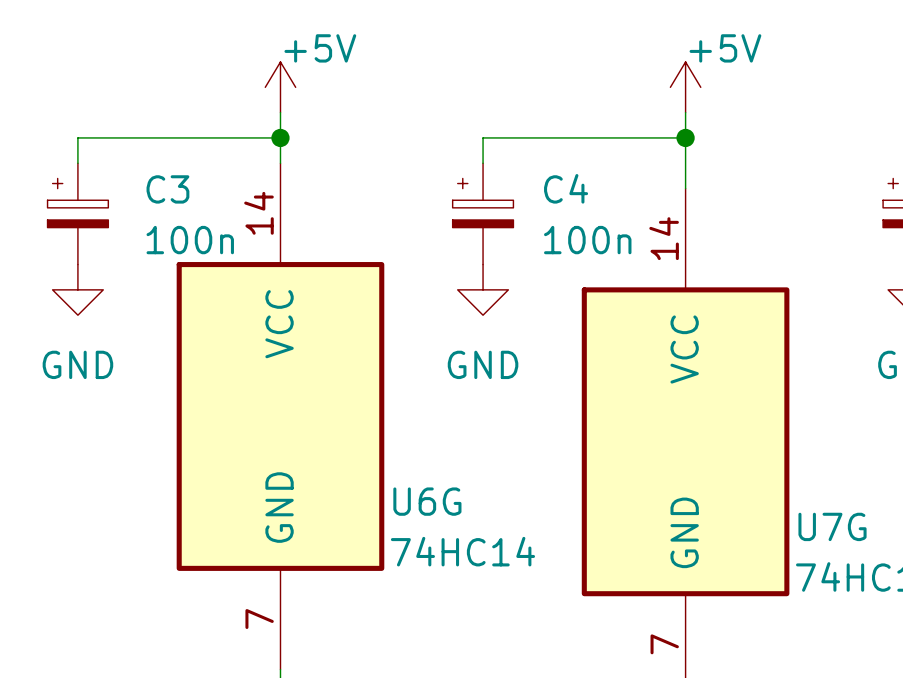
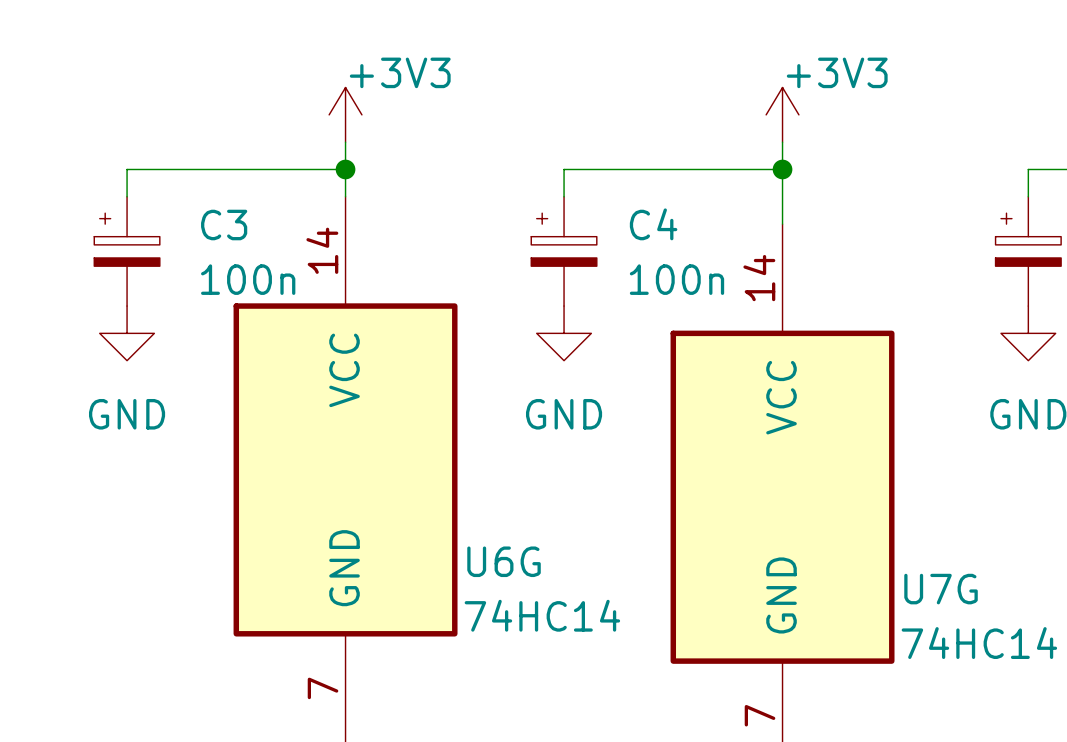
power symbol: +5V (280, 87) -> +3V3 (345, 114)
power symbol: +5V (685, 87) -> +3V3 (782, 114)

